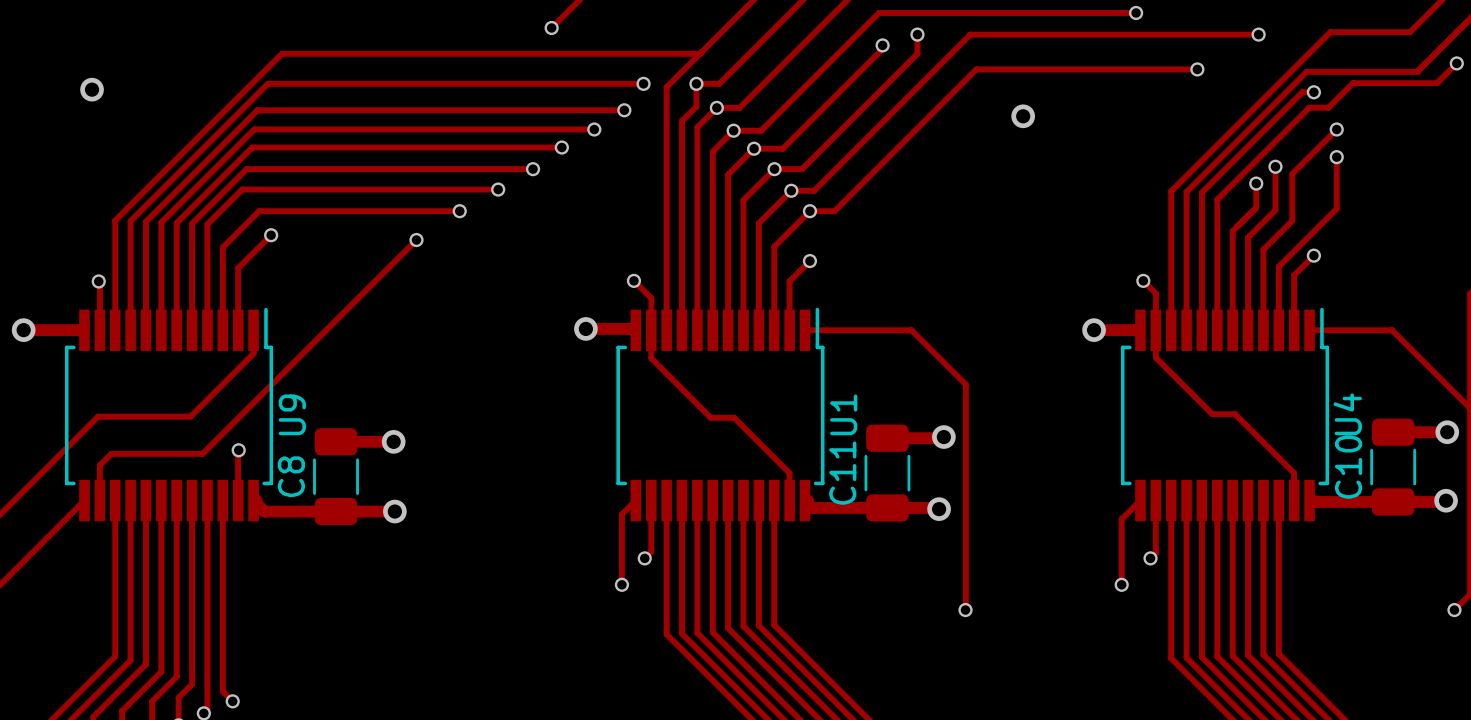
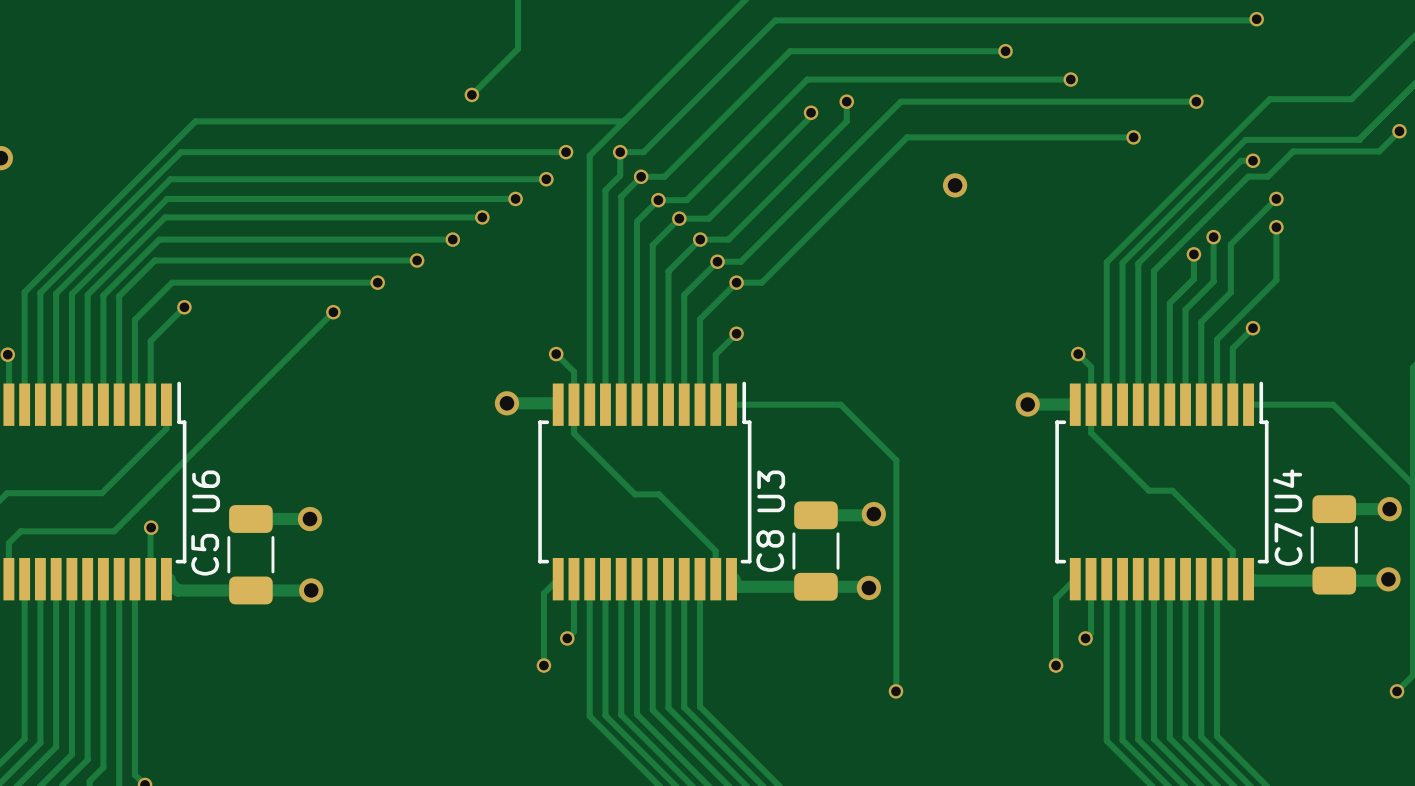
U9 name: U9 (292, 414) -> U6 (206, 491)
U1 name: U1 (843, 414) -> U3 (771, 491)
C10 name: C10 (1348, 467) -> C7 (1288, 544)
C11 name: C11 (842, 473) -> C8 (770, 551)
C8 name: C8 (291, 476) -> C5 (205, 554)

